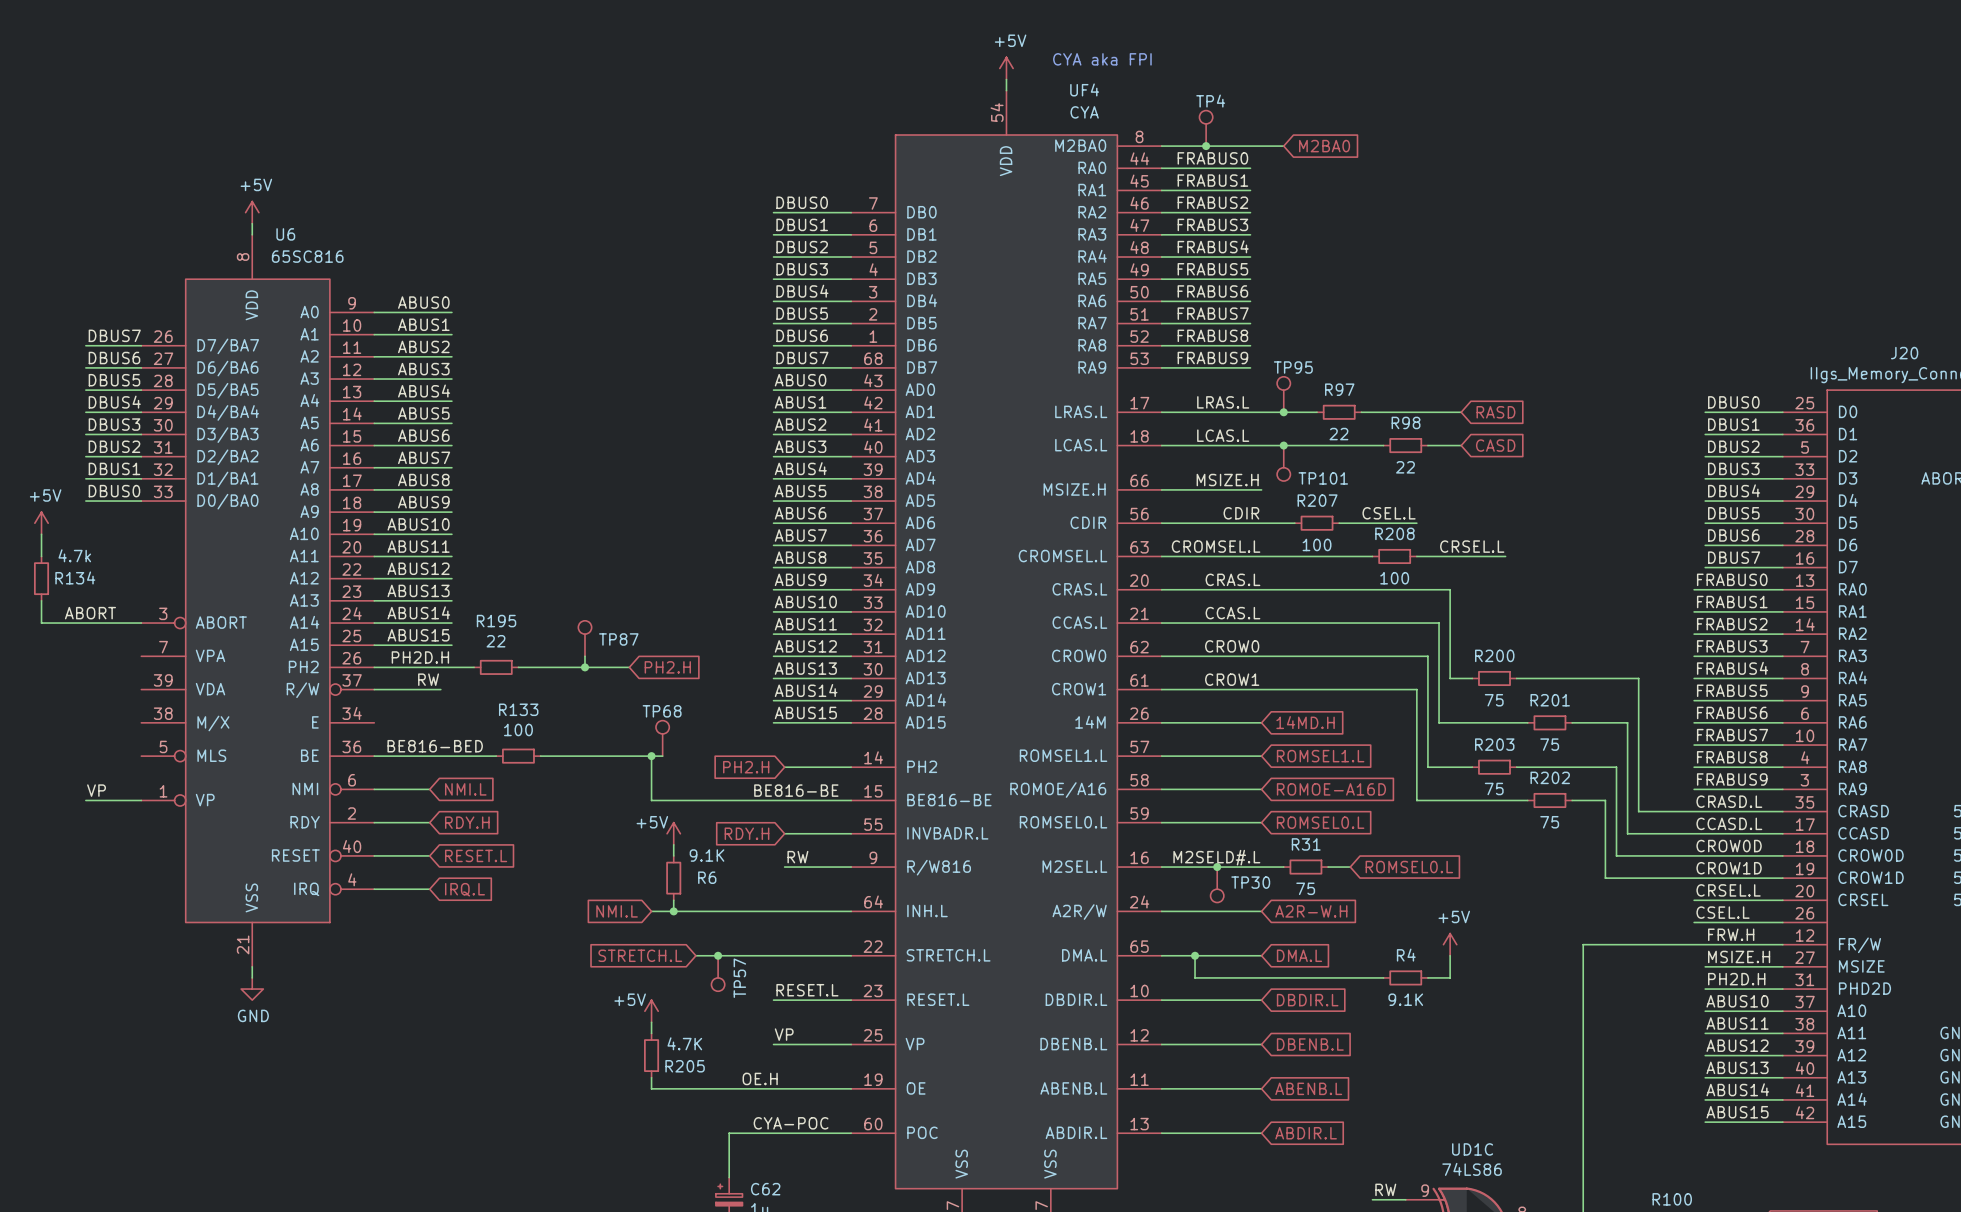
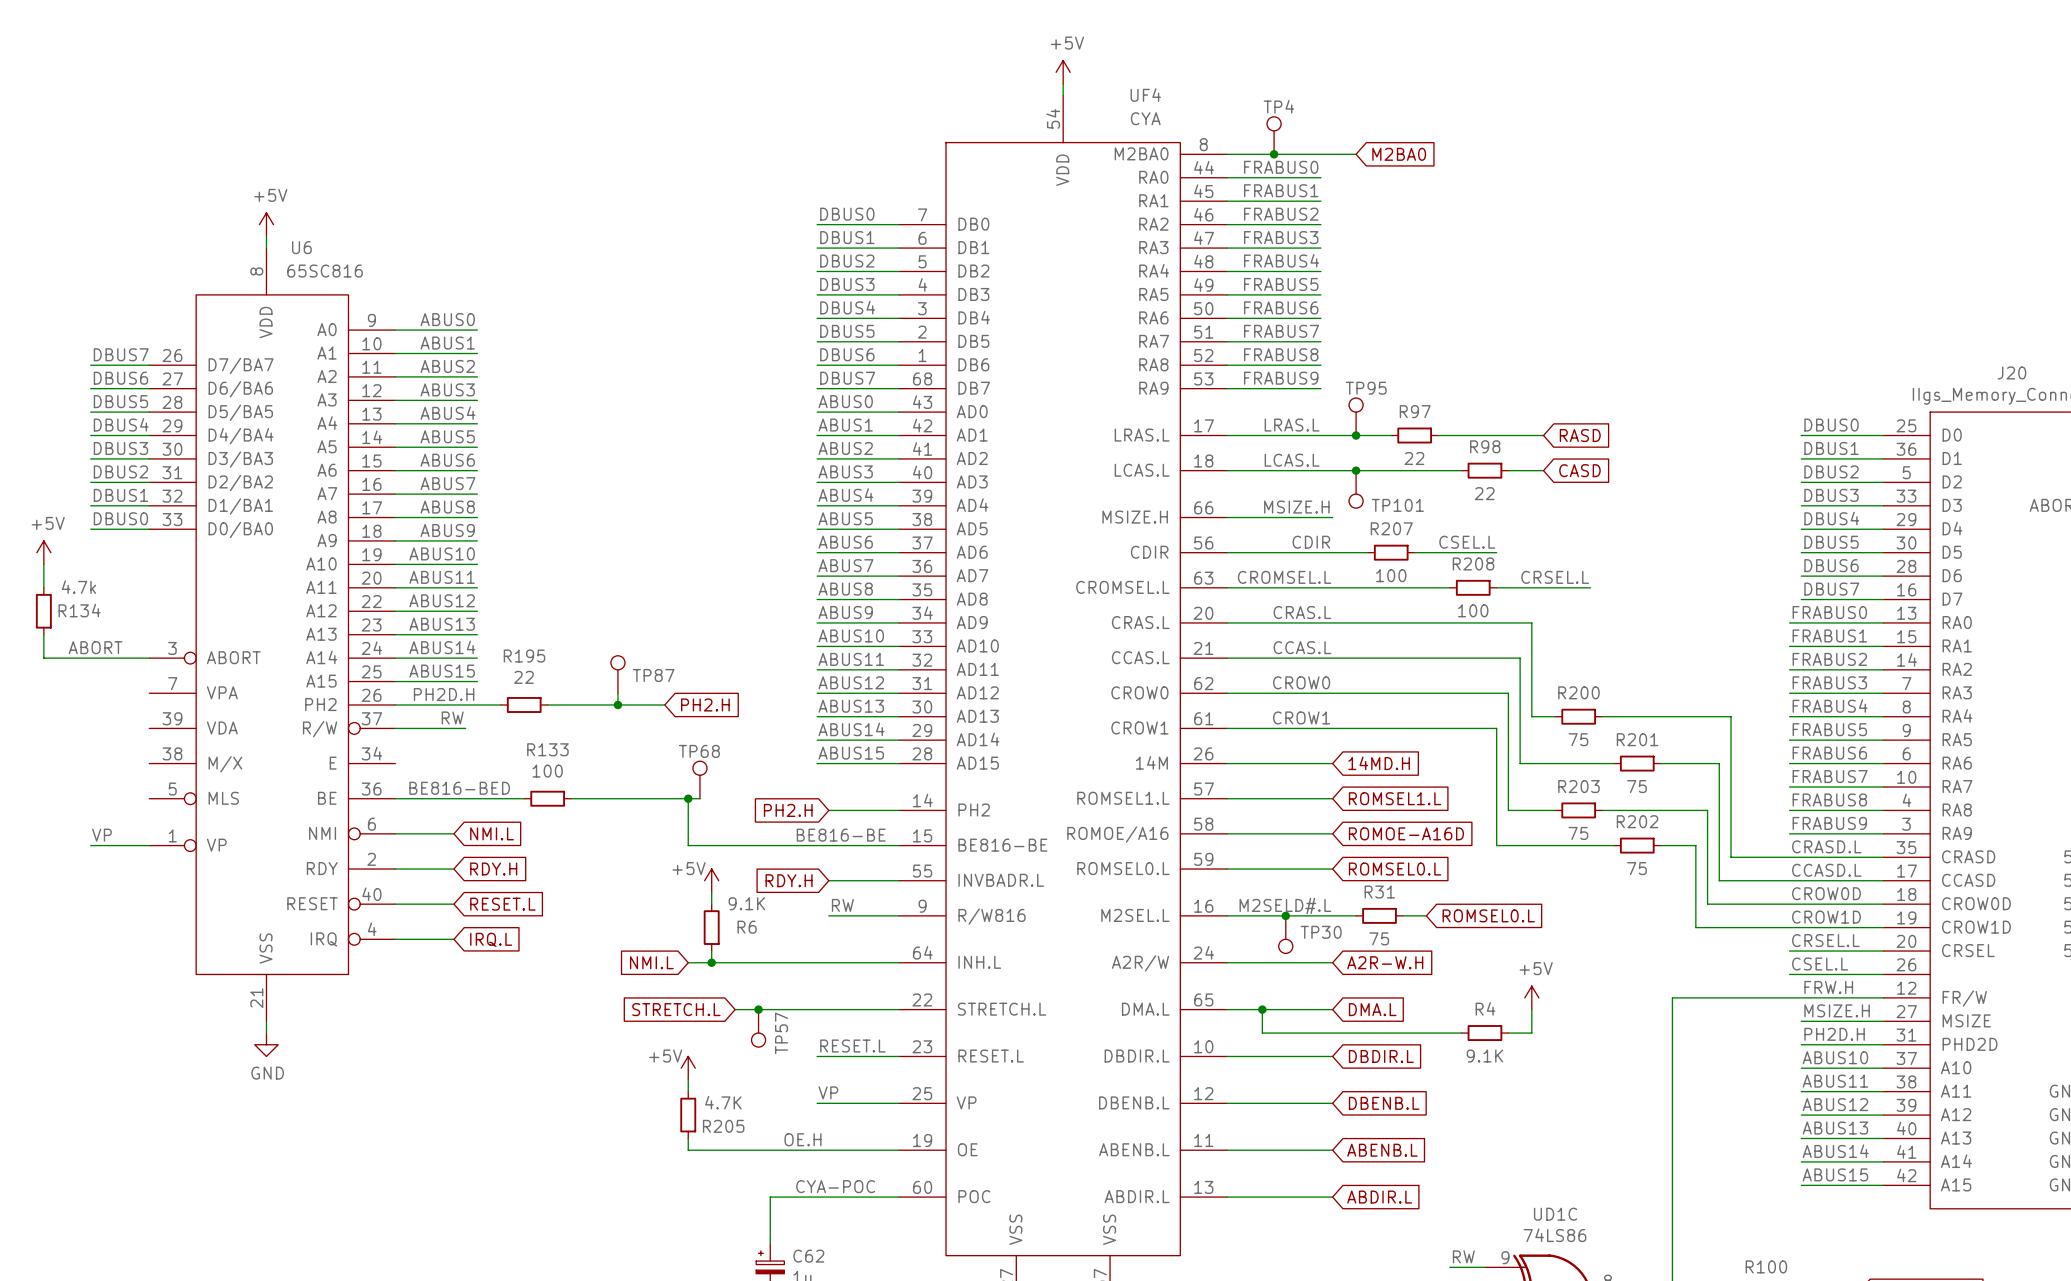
text: CYA aka FPI (1102, 59) -> none

